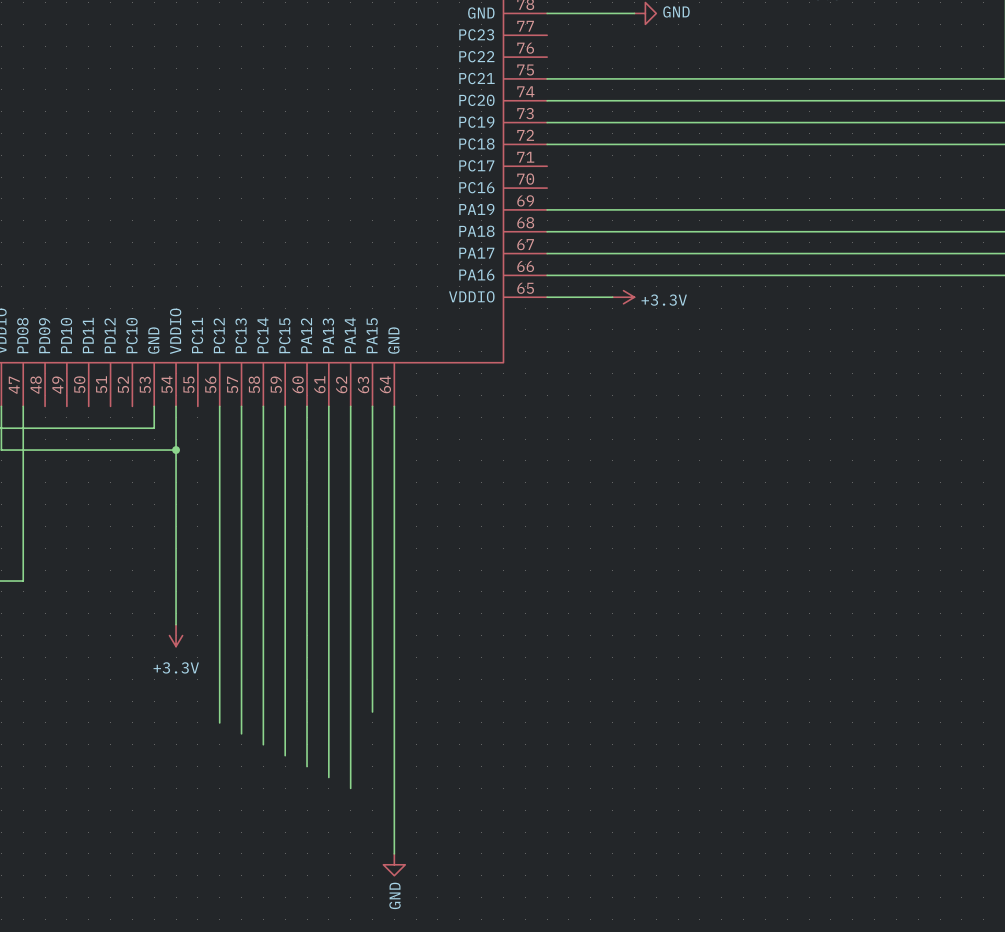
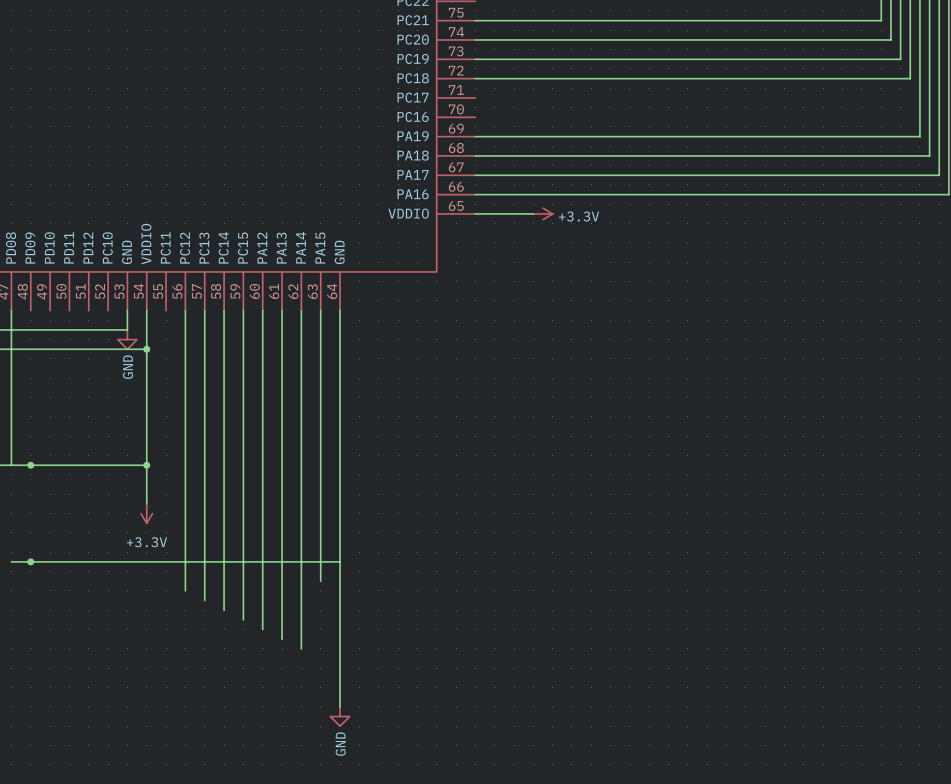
power symbol: none -> GND (127, 339)
wire: none -> (11, 465) (146, 465)
junction: none -> (30, 465)
junction: none -> (146, 465)
wire: none -> (11, 561) (340, 561)
junction: none -> (30, 561)

